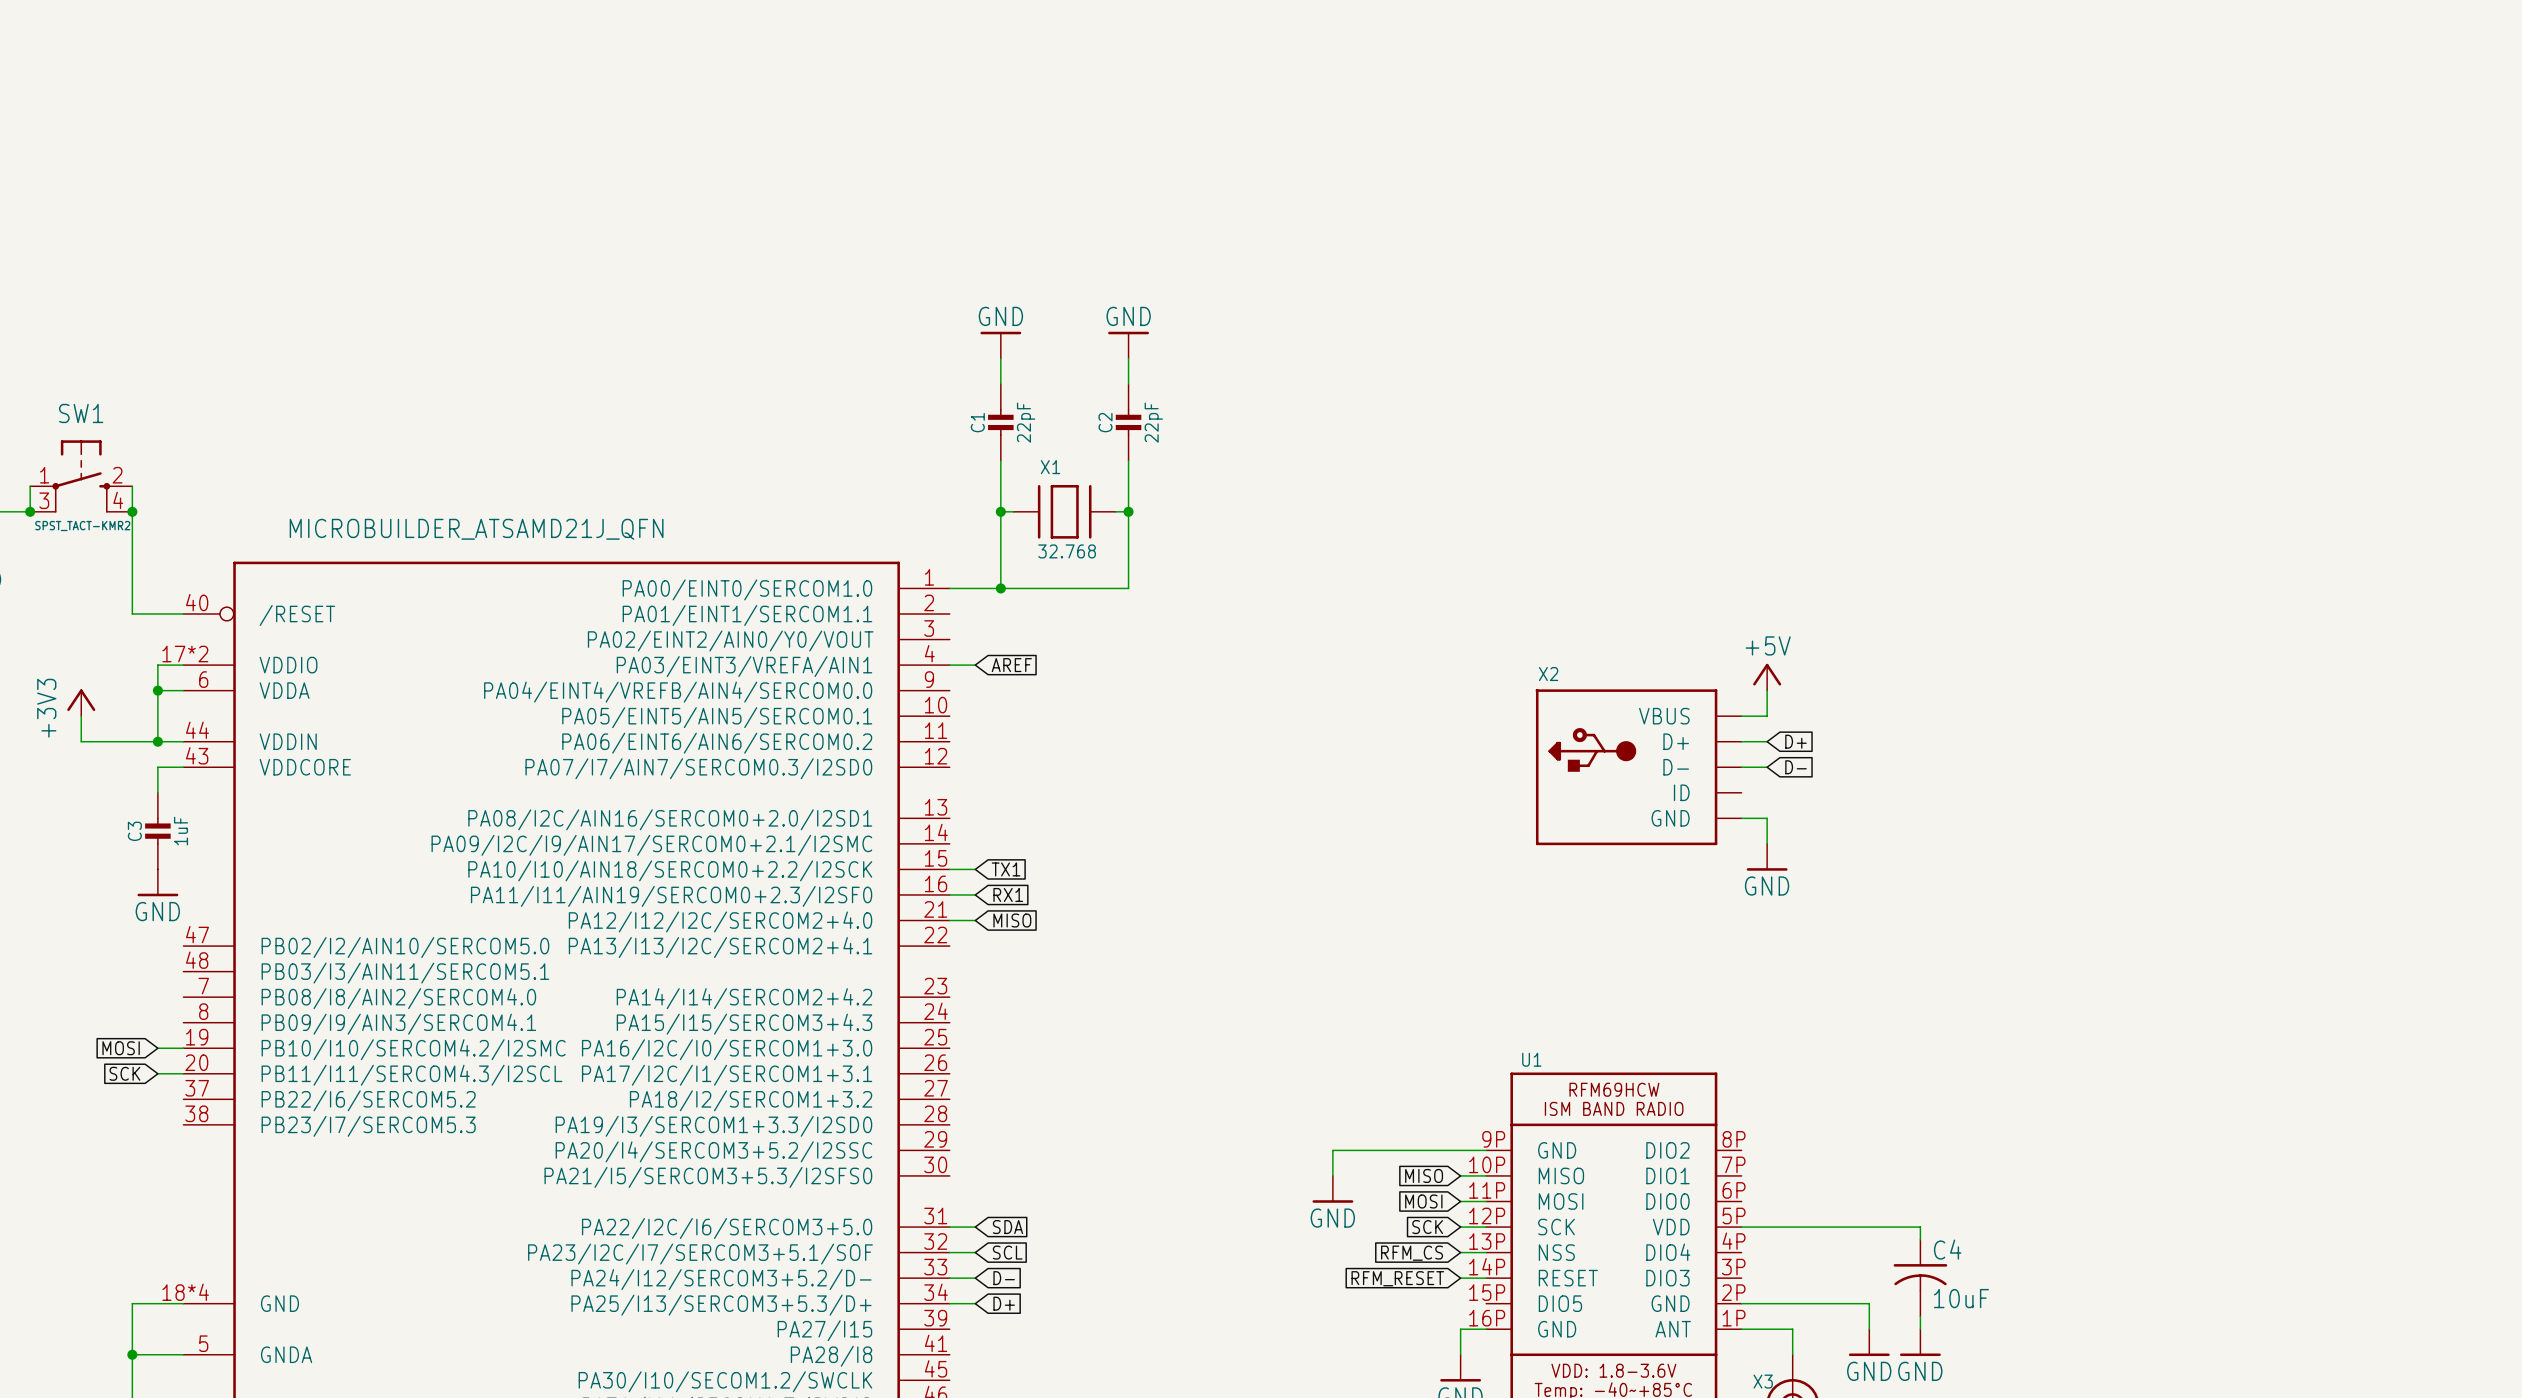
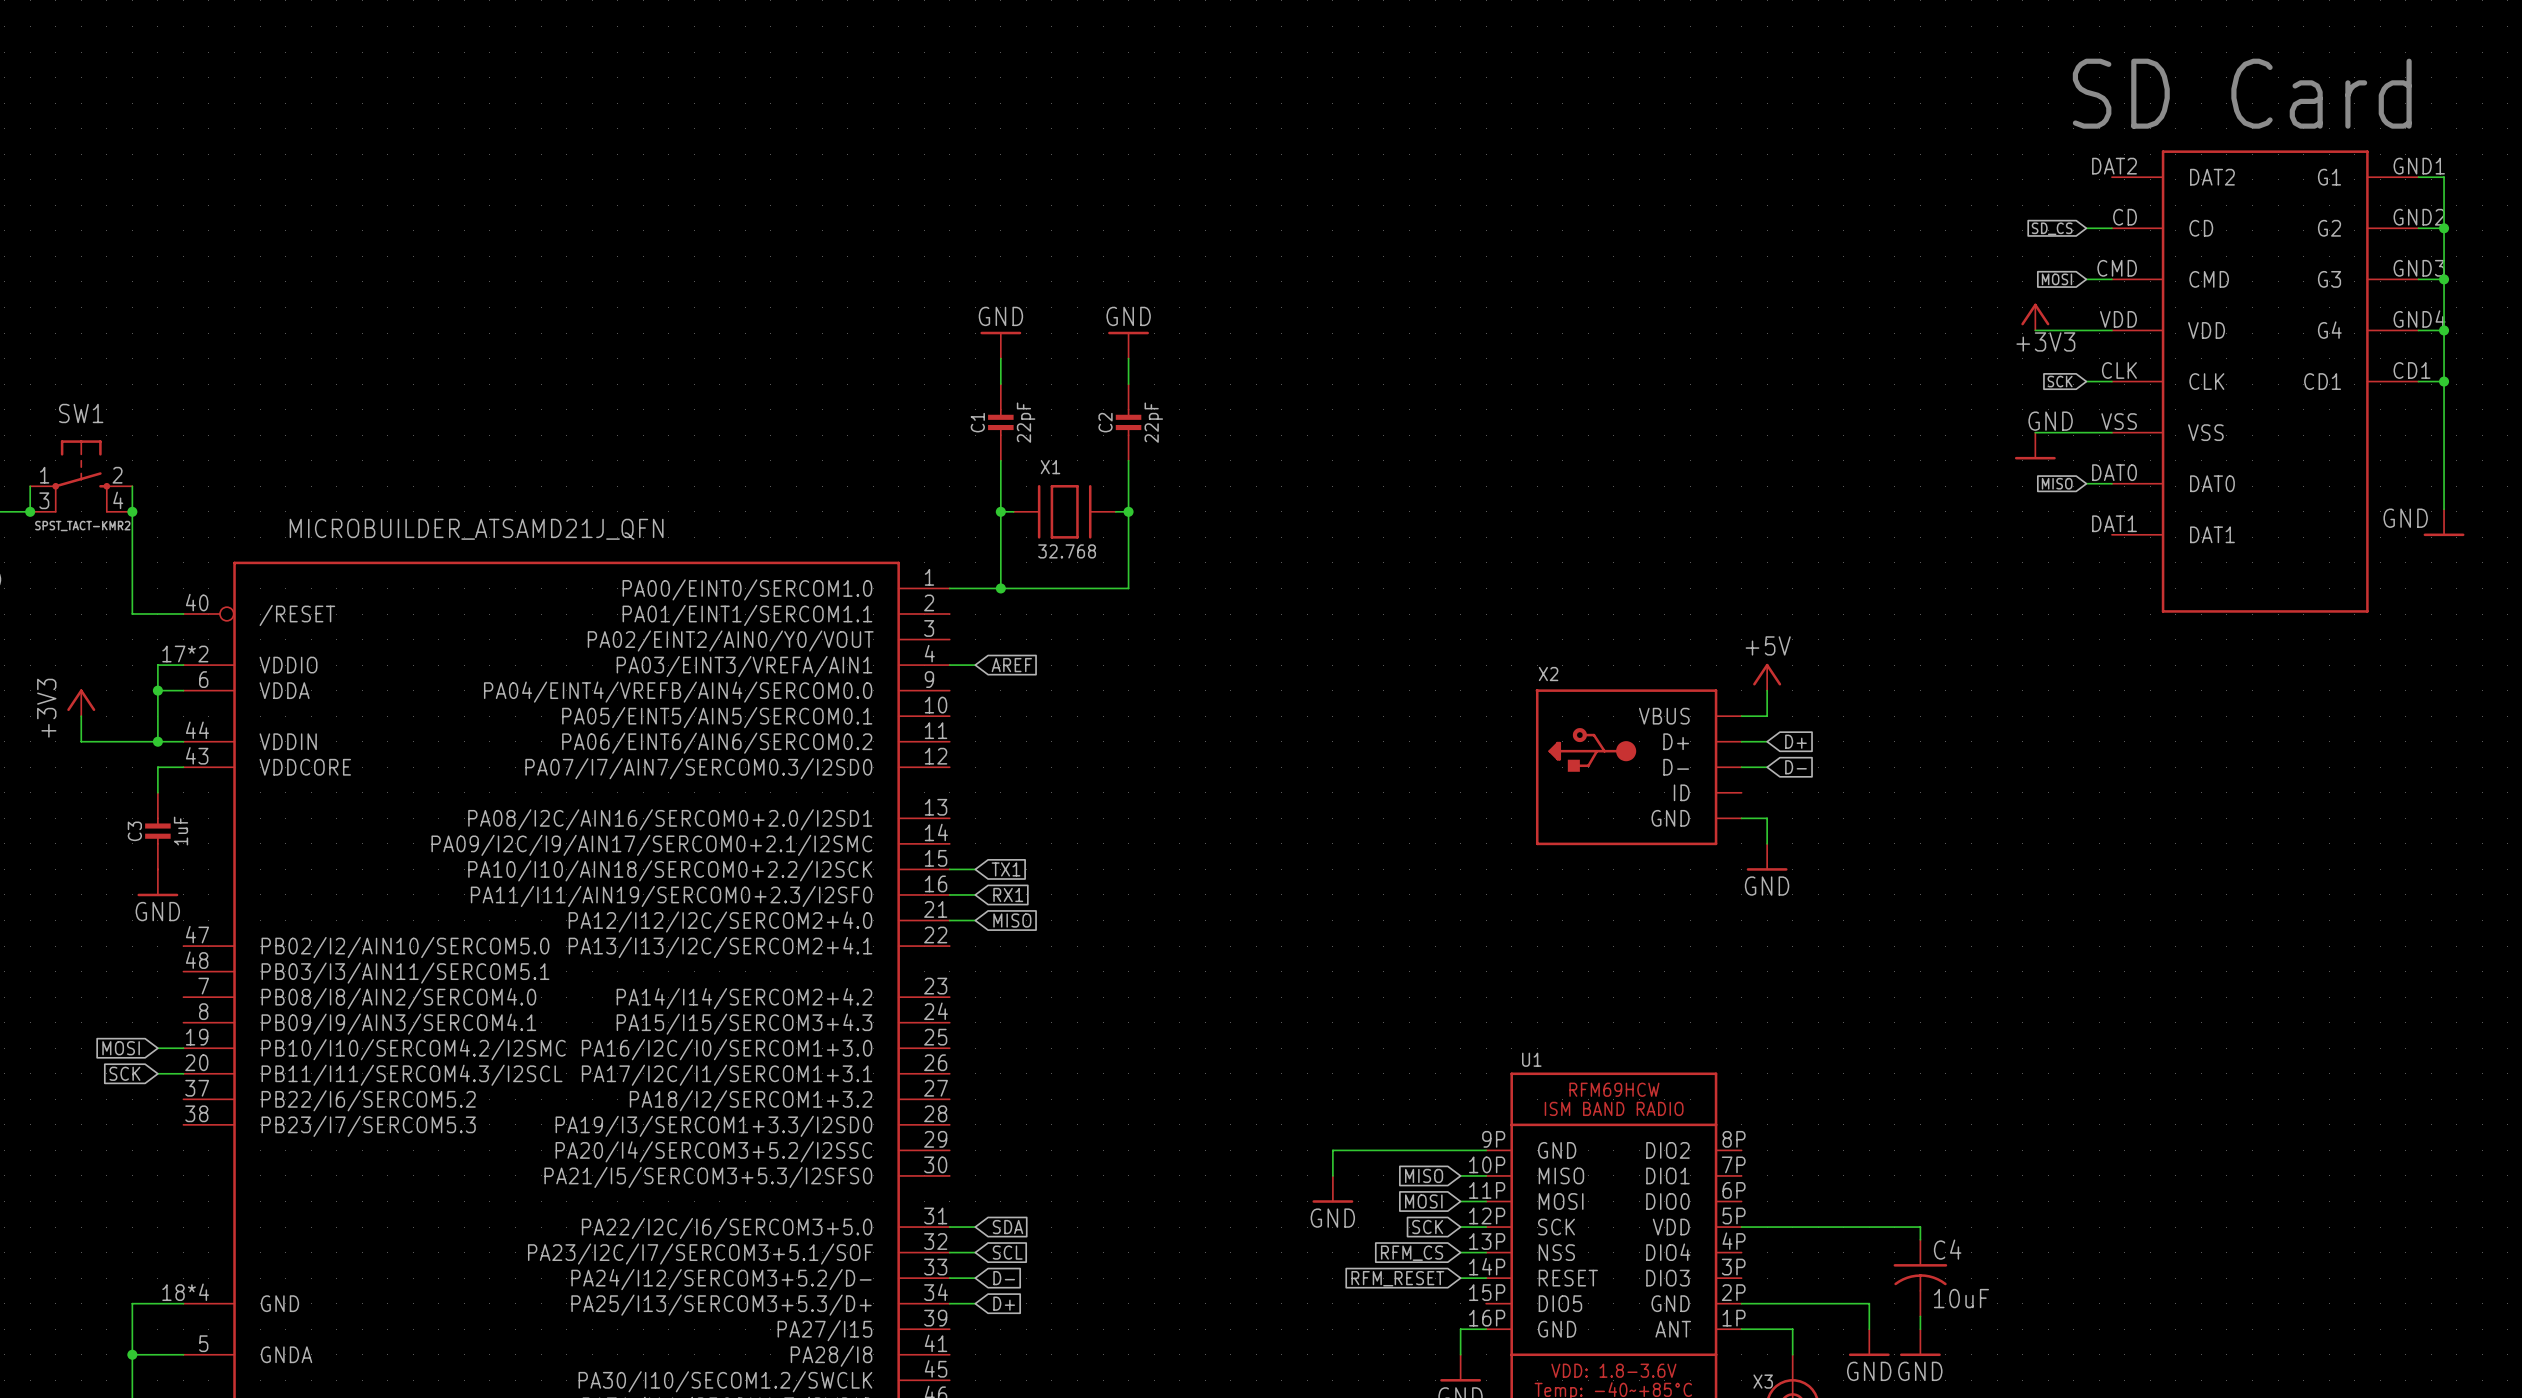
text: none -> SD Card (2242, 93)
wire: none -> (2418, 177) (2444, 177) (2444, 509)
global label: none -> SD_CS (2052, 228)
wire: none -> (2086, 228) (2111, 228)
wire: none -> (2418, 228) (2444, 228)
junction: none -> (2444, 228)
global label: none -> MOSI (2056, 279)
wire: none -> (2086, 279) (2111, 279)
wire: none -> (2418, 279) (2444, 279)
junction: none -> (2444, 279)
power symbol: none -> +3V3 (2035, 317)
wire: none -> (2035, 330) (2111, 330)
wire: none -> (2418, 330) (2444, 330)
junction: none -> (2444, 330)
global label: none -> SCK (2060, 381)
wire: none -> (2086, 381) (2111, 381)
part: none -> (2265, 381)
wire: none -> (2418, 381) (2444, 381)
junction: none -> (2444, 381)
wire: none -> (2035, 432) (2111, 432)
power symbol: none -> GND (2035, 446)
global label: none -> MISO (2057, 483)
wire: none -> (2086, 483) (2111, 483)
power symbol: none -> GND (2444, 522)

